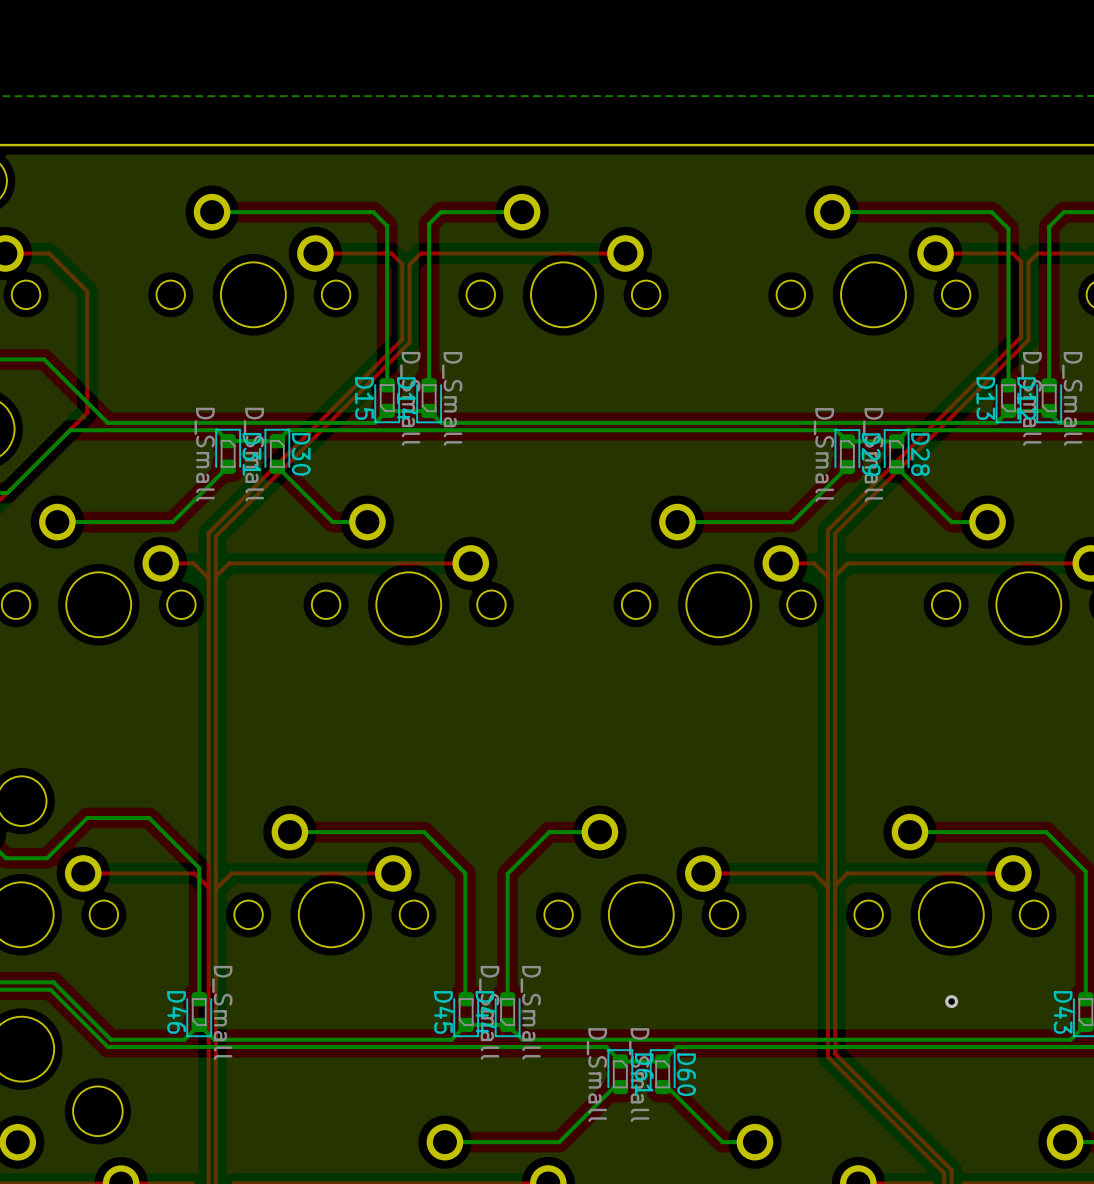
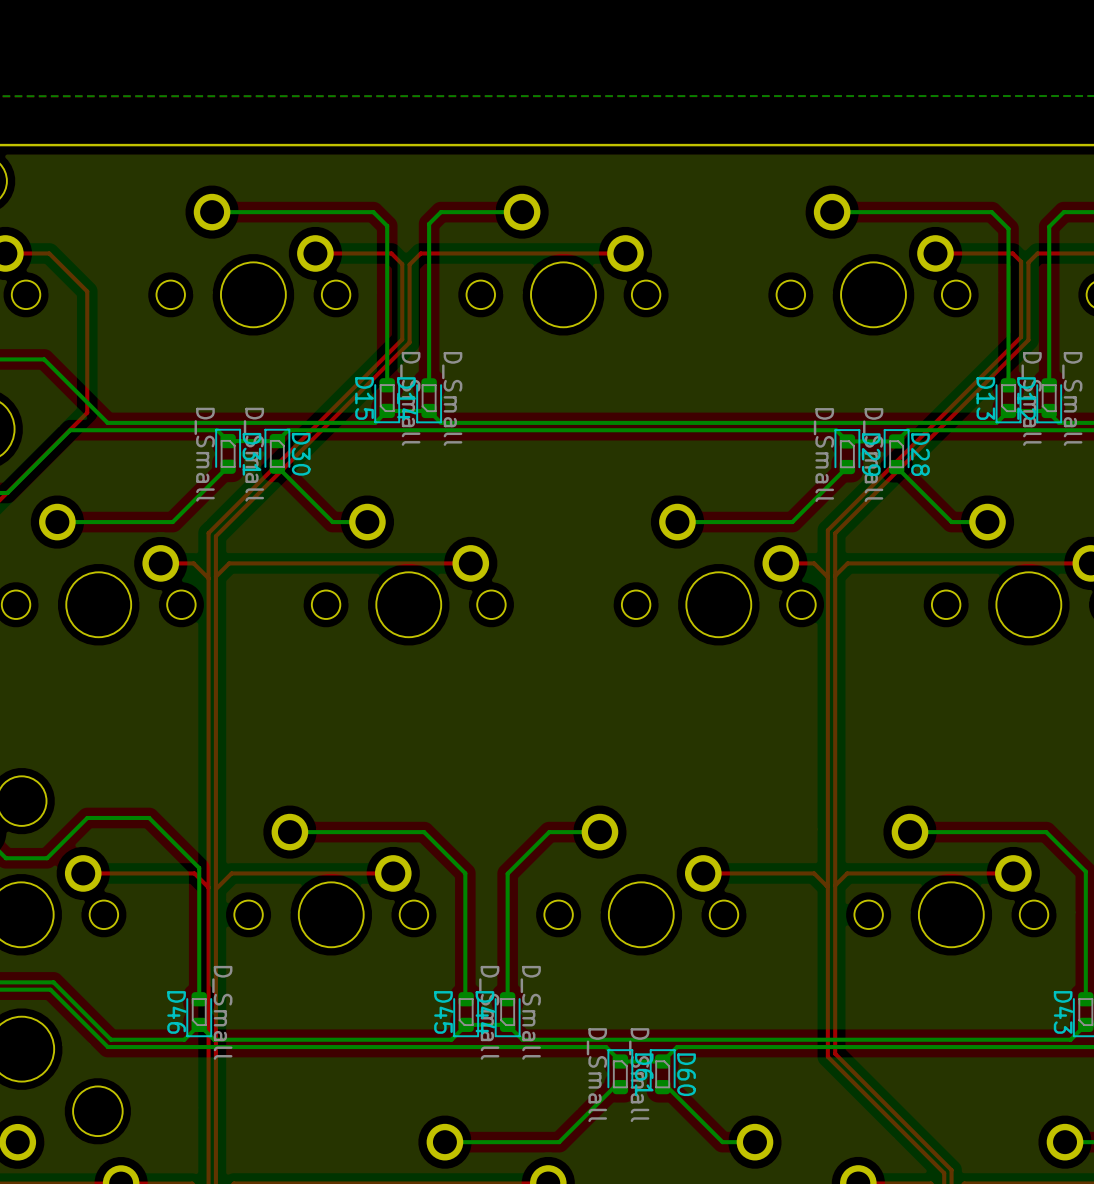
via: (951, 1001) -> none

